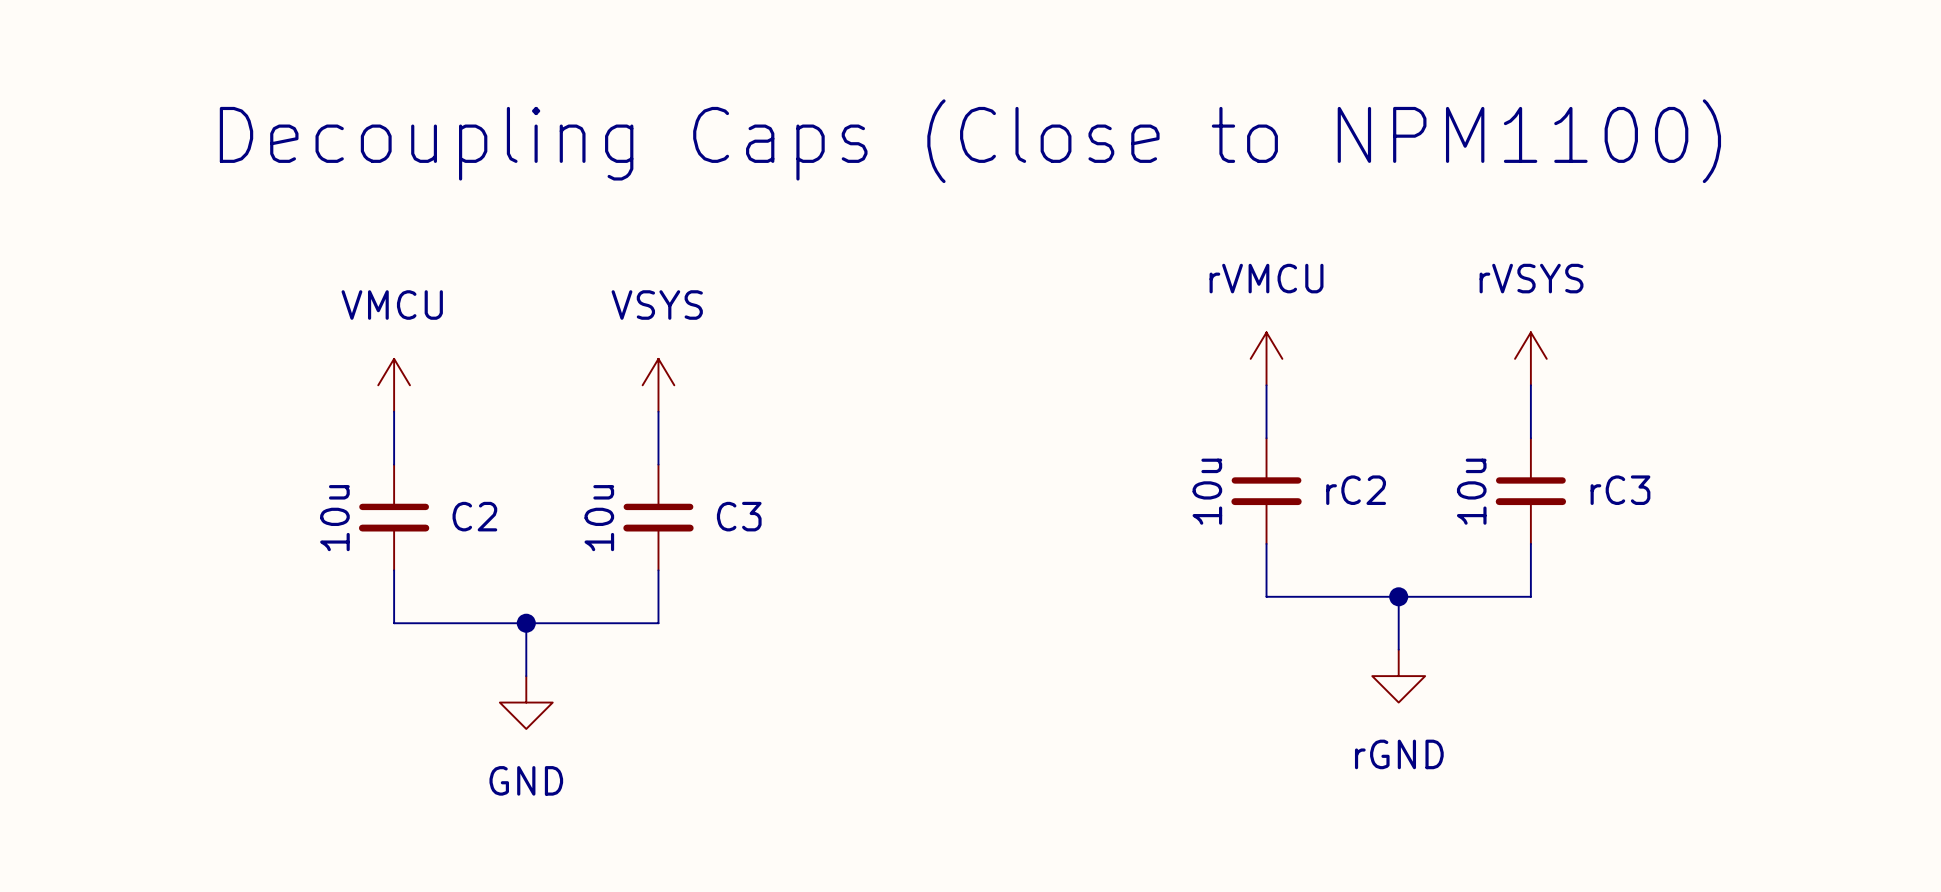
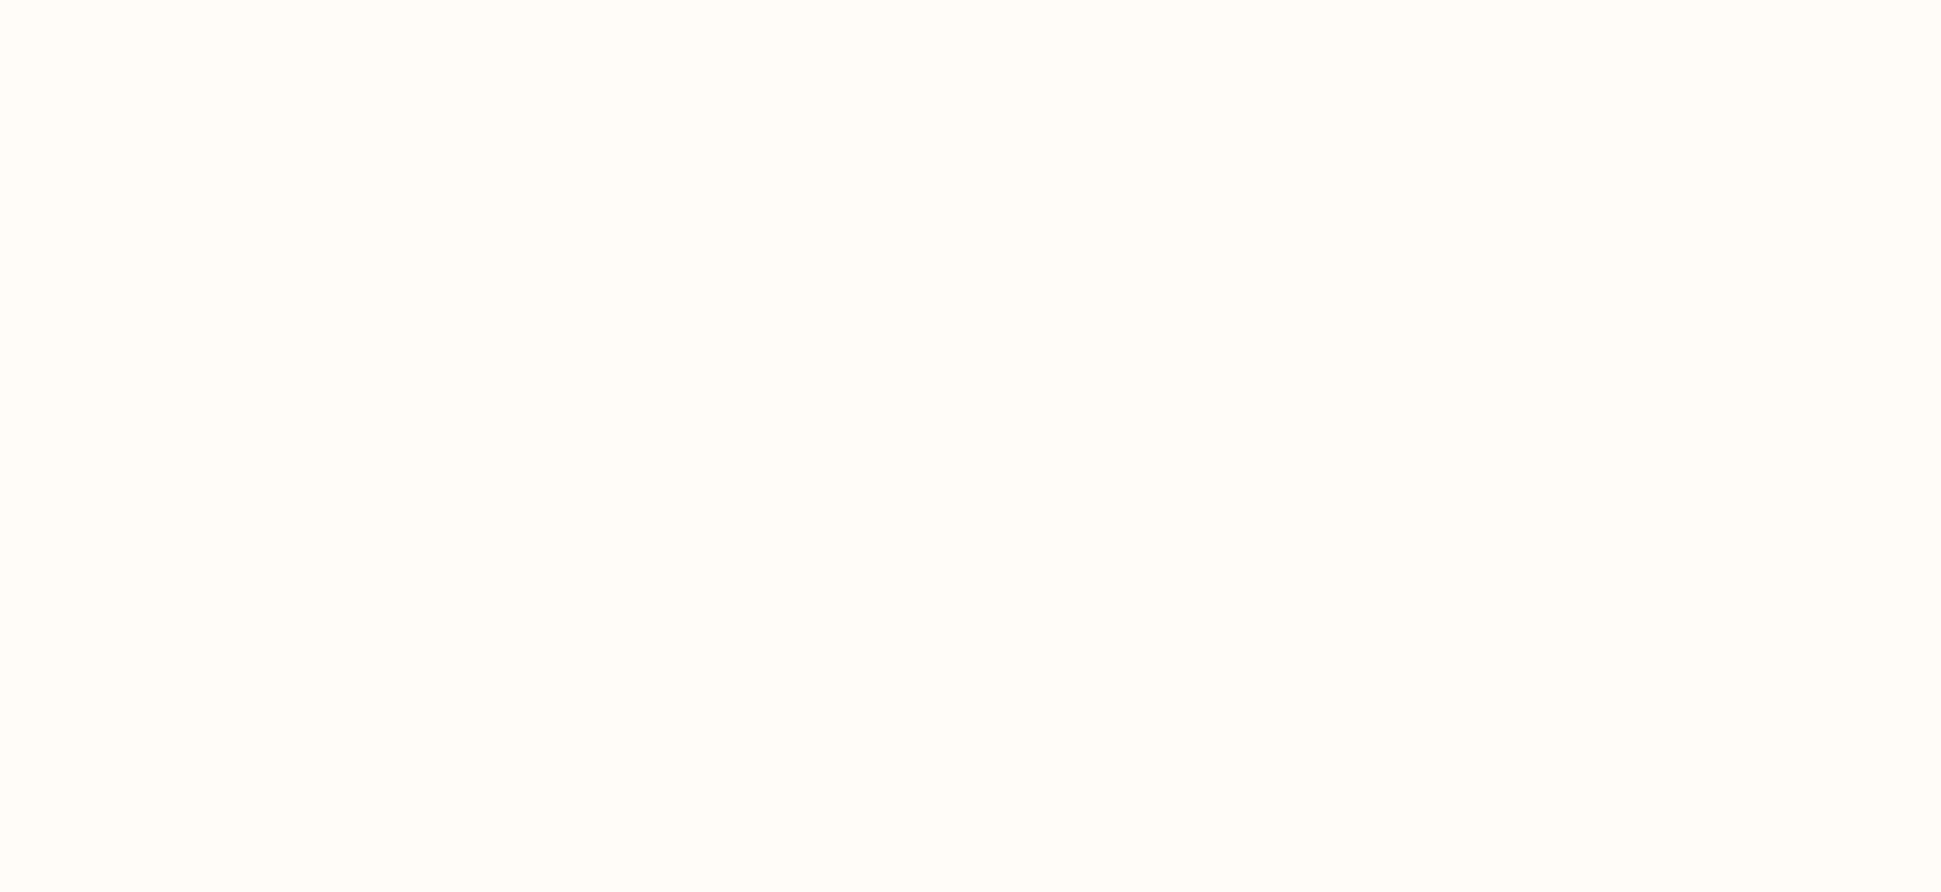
text: Decoupling Caps (Close to NPM1100) (970, 141) -> none
power symbol: rVMCU (1266, 358) -> none
power symbol: rVSYS (1530, 358) -> none
power symbol: VMCU (394, 385) -> none
power symbol: VSYS (658, 385) -> none
wire: (1266, 385) (1266, 438) -> none
wire: (1530, 385) (1530, 438) -> none
wire: (394, 411) (394, 464) -> none
wire: (658, 411) (658, 464) -> none
rC2: 10u (1266, 491) -> none
rC3: 10u (1530, 491) -> none
C2: 10u (394, 517) -> none
C3: 10u (658, 517) -> none
wire: (1266, 543) (1266, 596) (1530, 596) (1530, 543) -> none
wire: (394, 570) (394, 623) (658, 623) (658, 570) -> none
wire: (1398, 596) (1398, 649) -> none
junction: (1398, 596) -> none
wire: (526, 623) (526, 676) -> none
junction: (526, 623) -> none
power symbol: rGND (1398, 676) -> none
power symbol: GND (526, 702) -> none

